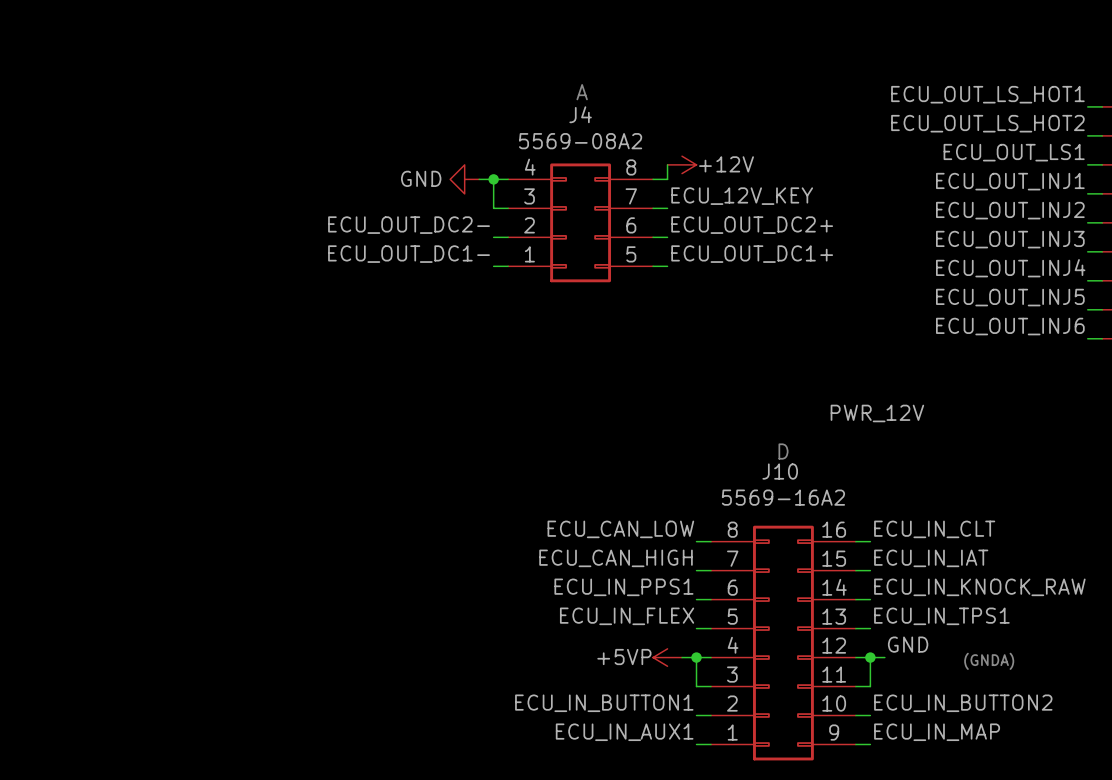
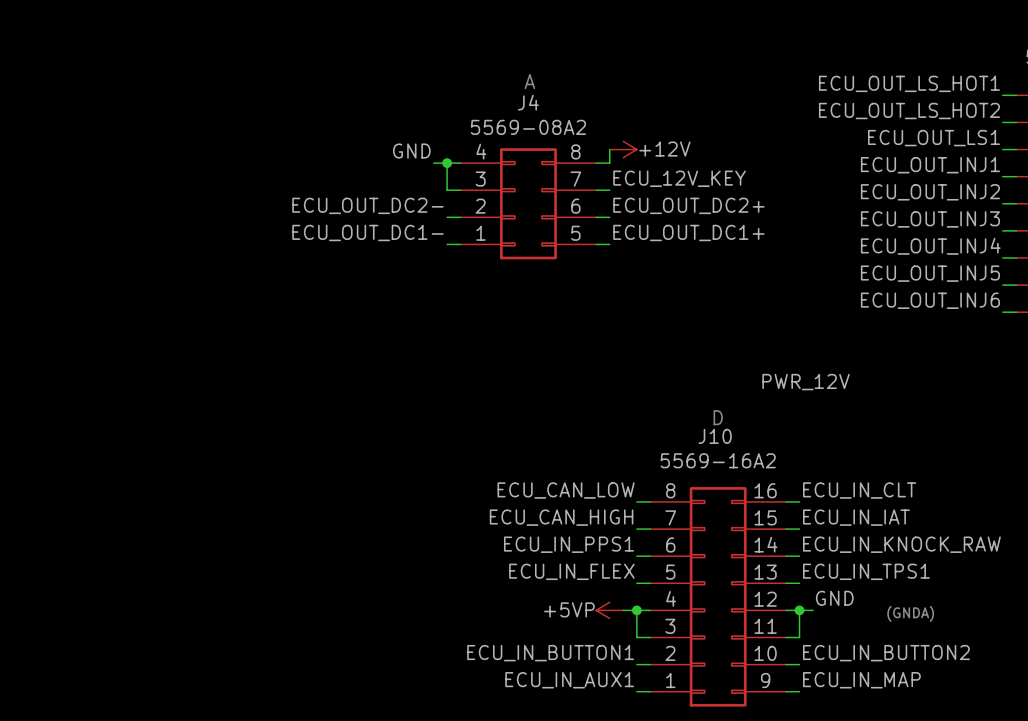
label: none -> GND (411, 151)
power symbol: GND (464, 179) -> none

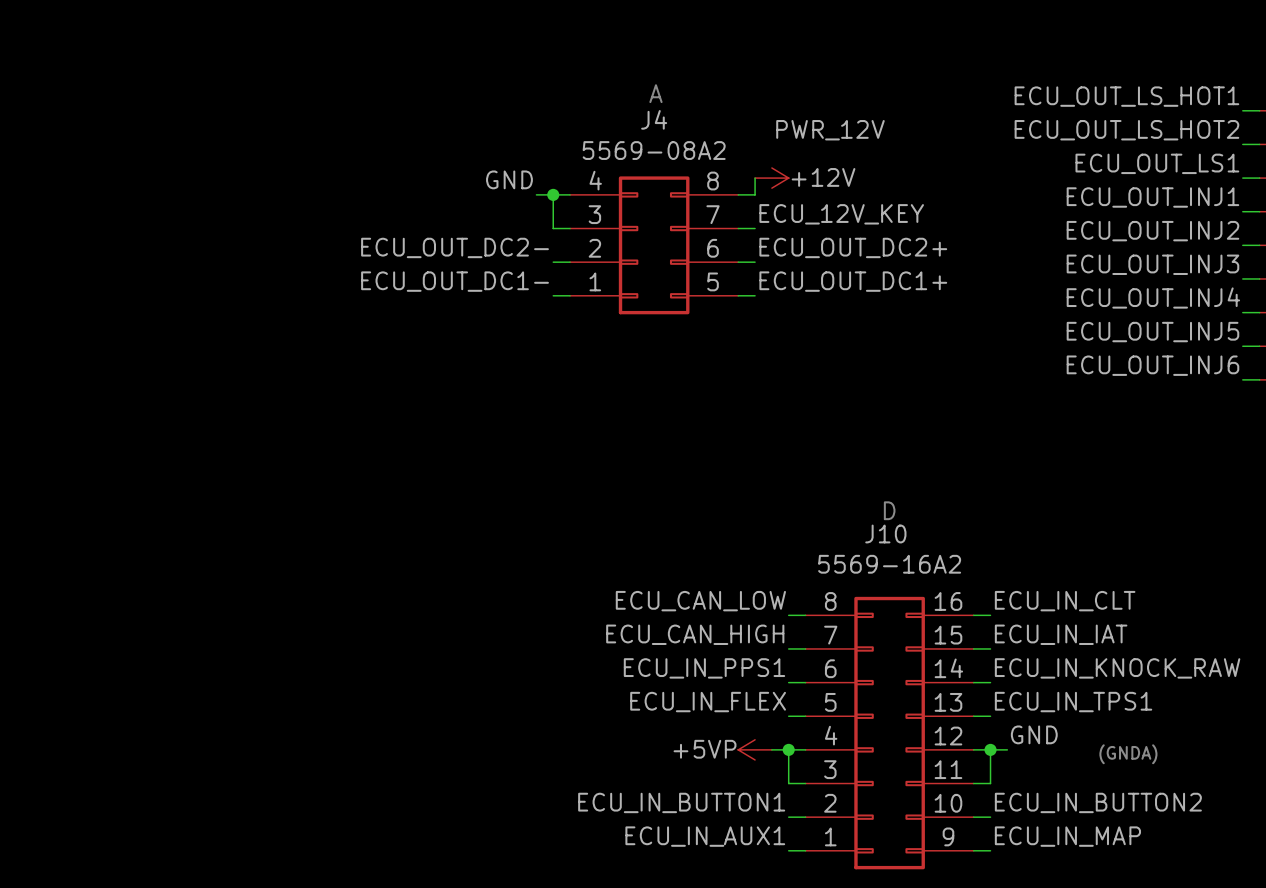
label: none -> PWR_12V (830, 130)
label: PWR_12V (806, 382) -> none

